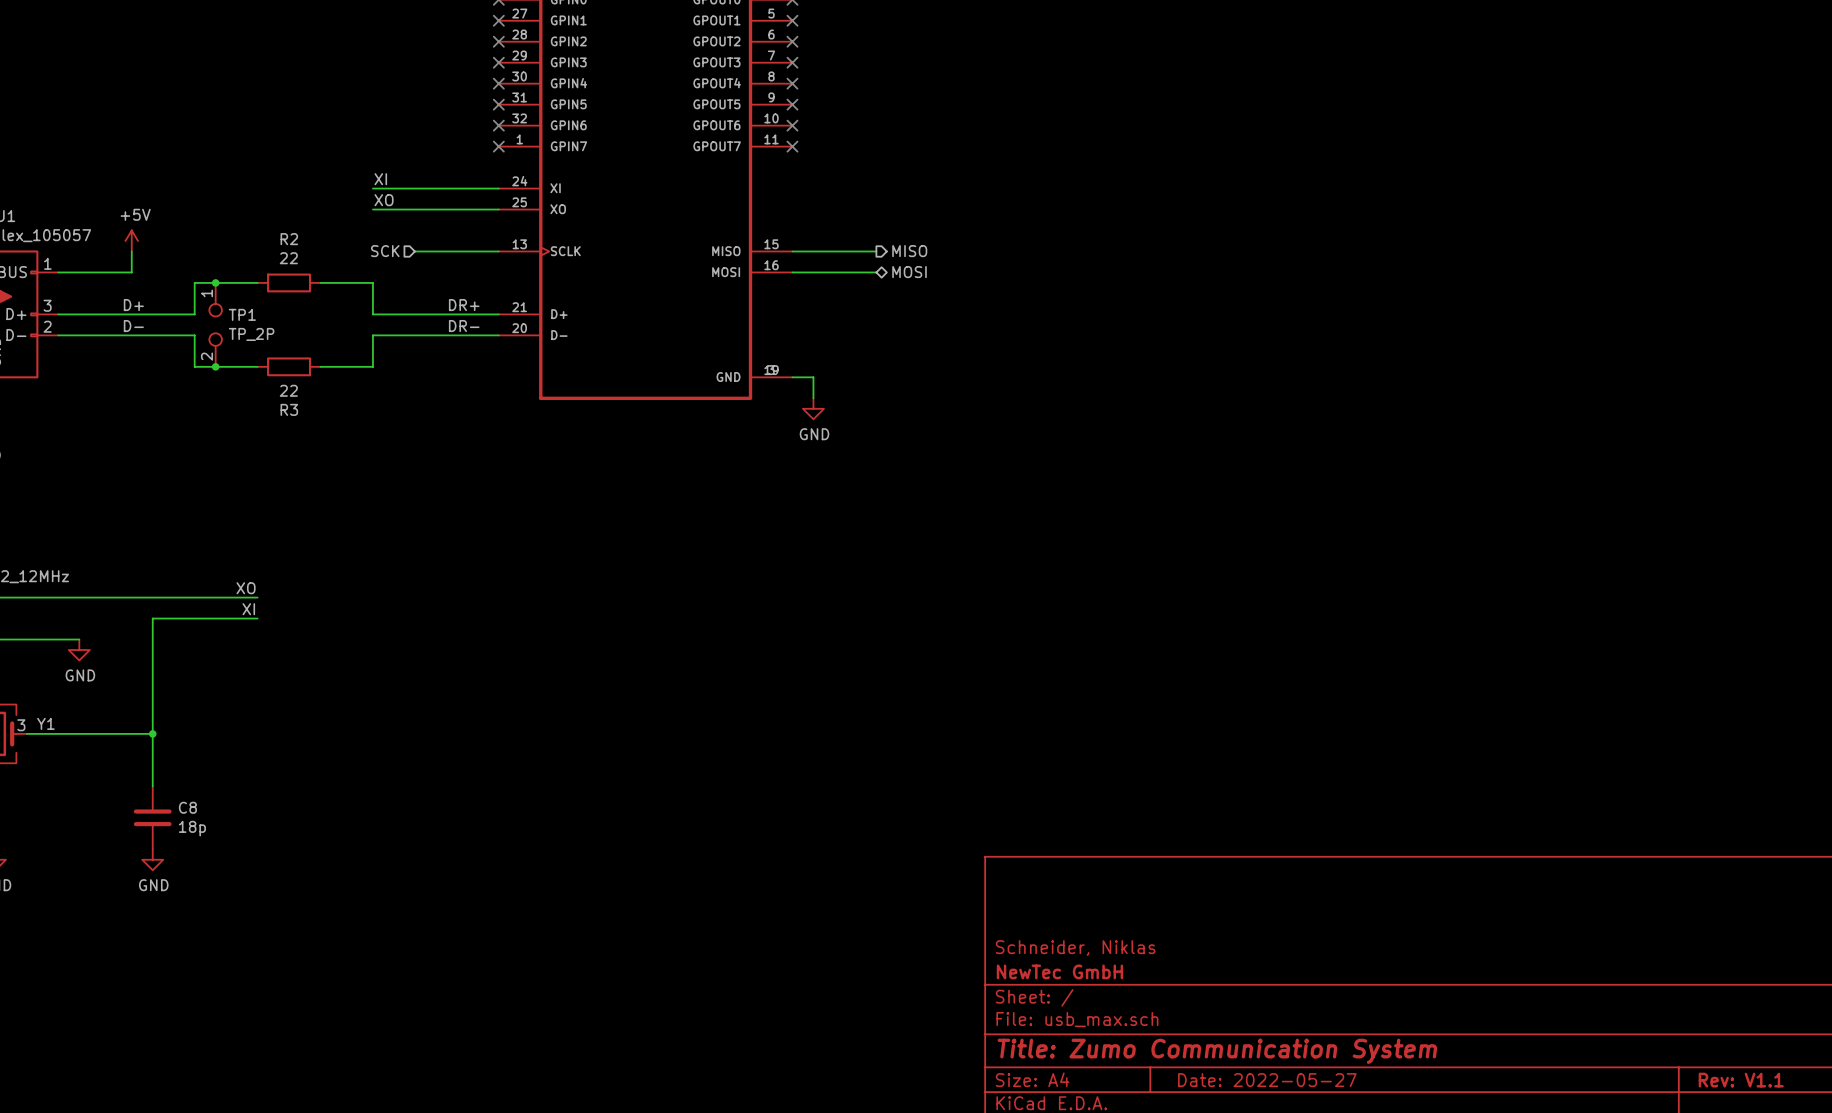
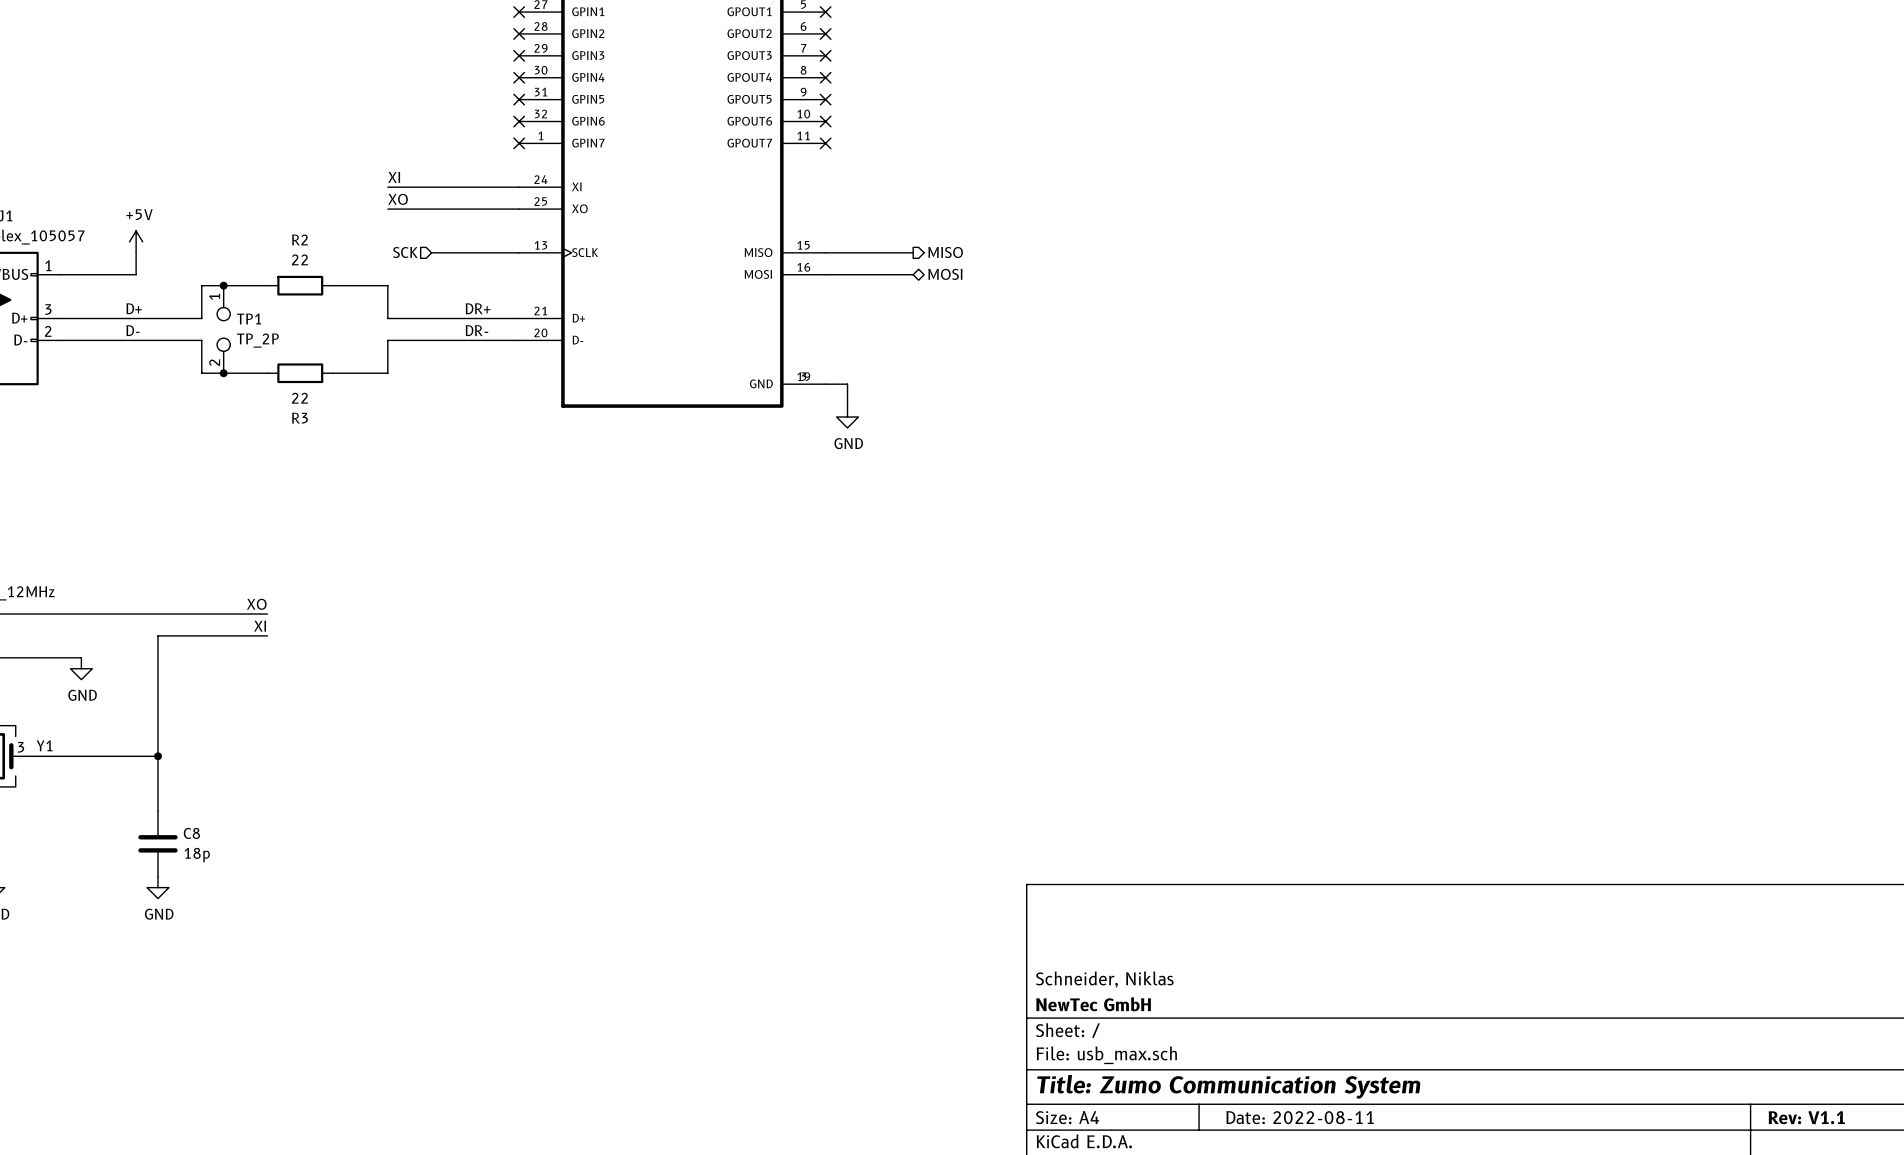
title block: Date: 2022-05-27 (1267, 1080) -> Date: 2022-08-11 (1300, 1117)

